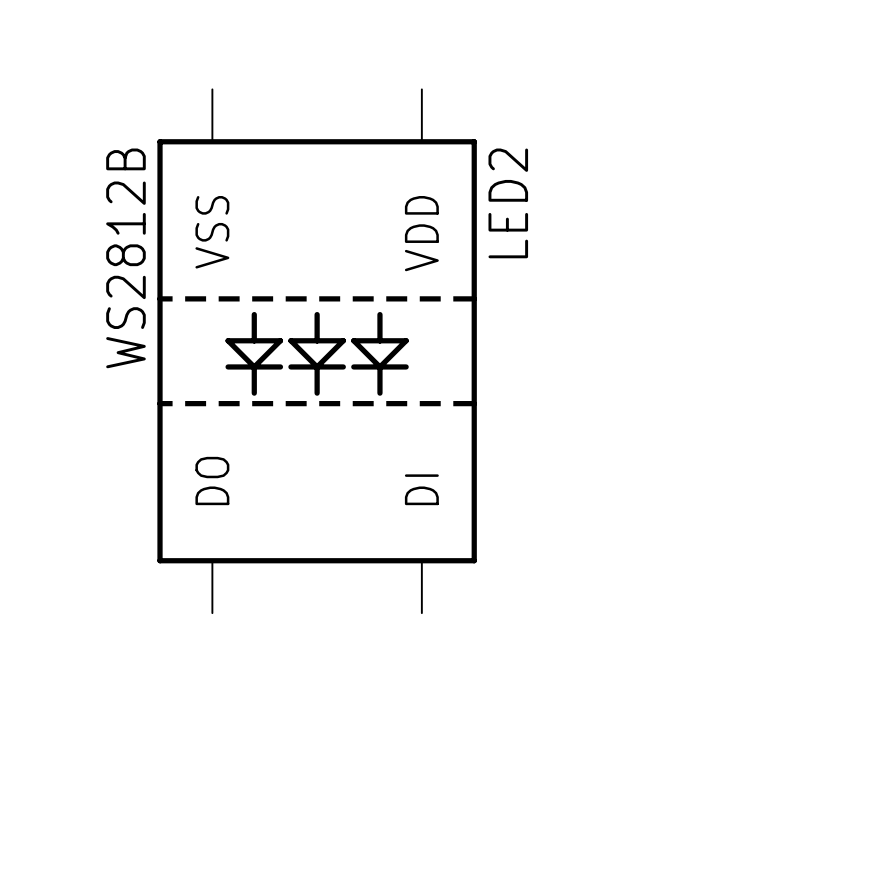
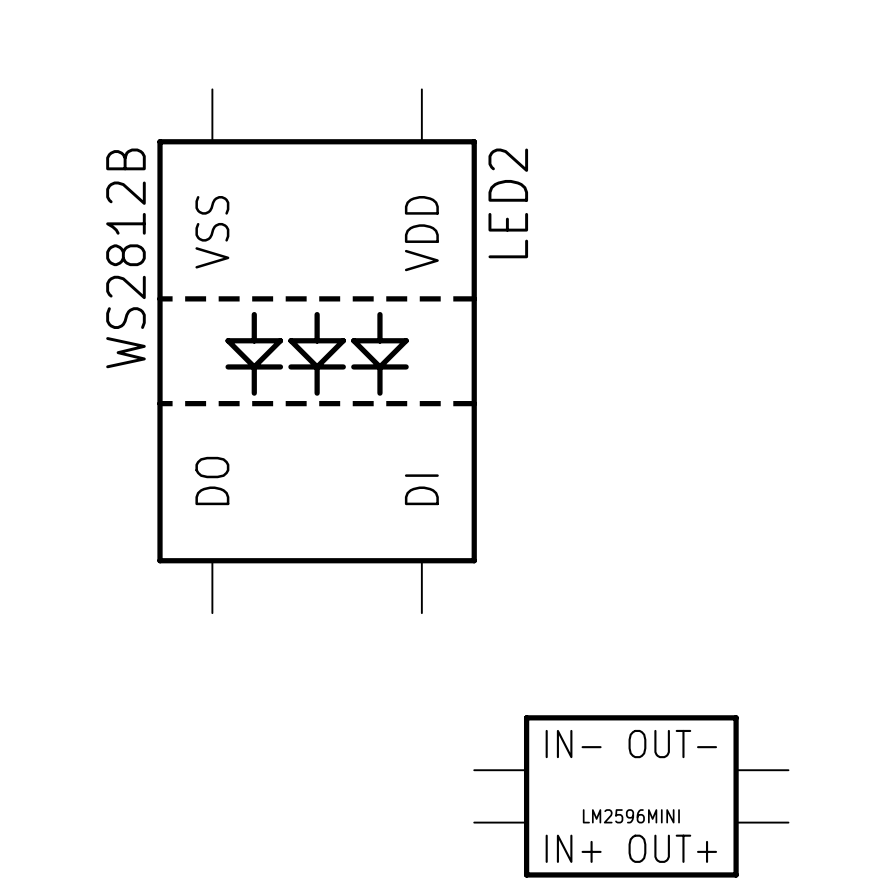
part: none -> (631, 796)

